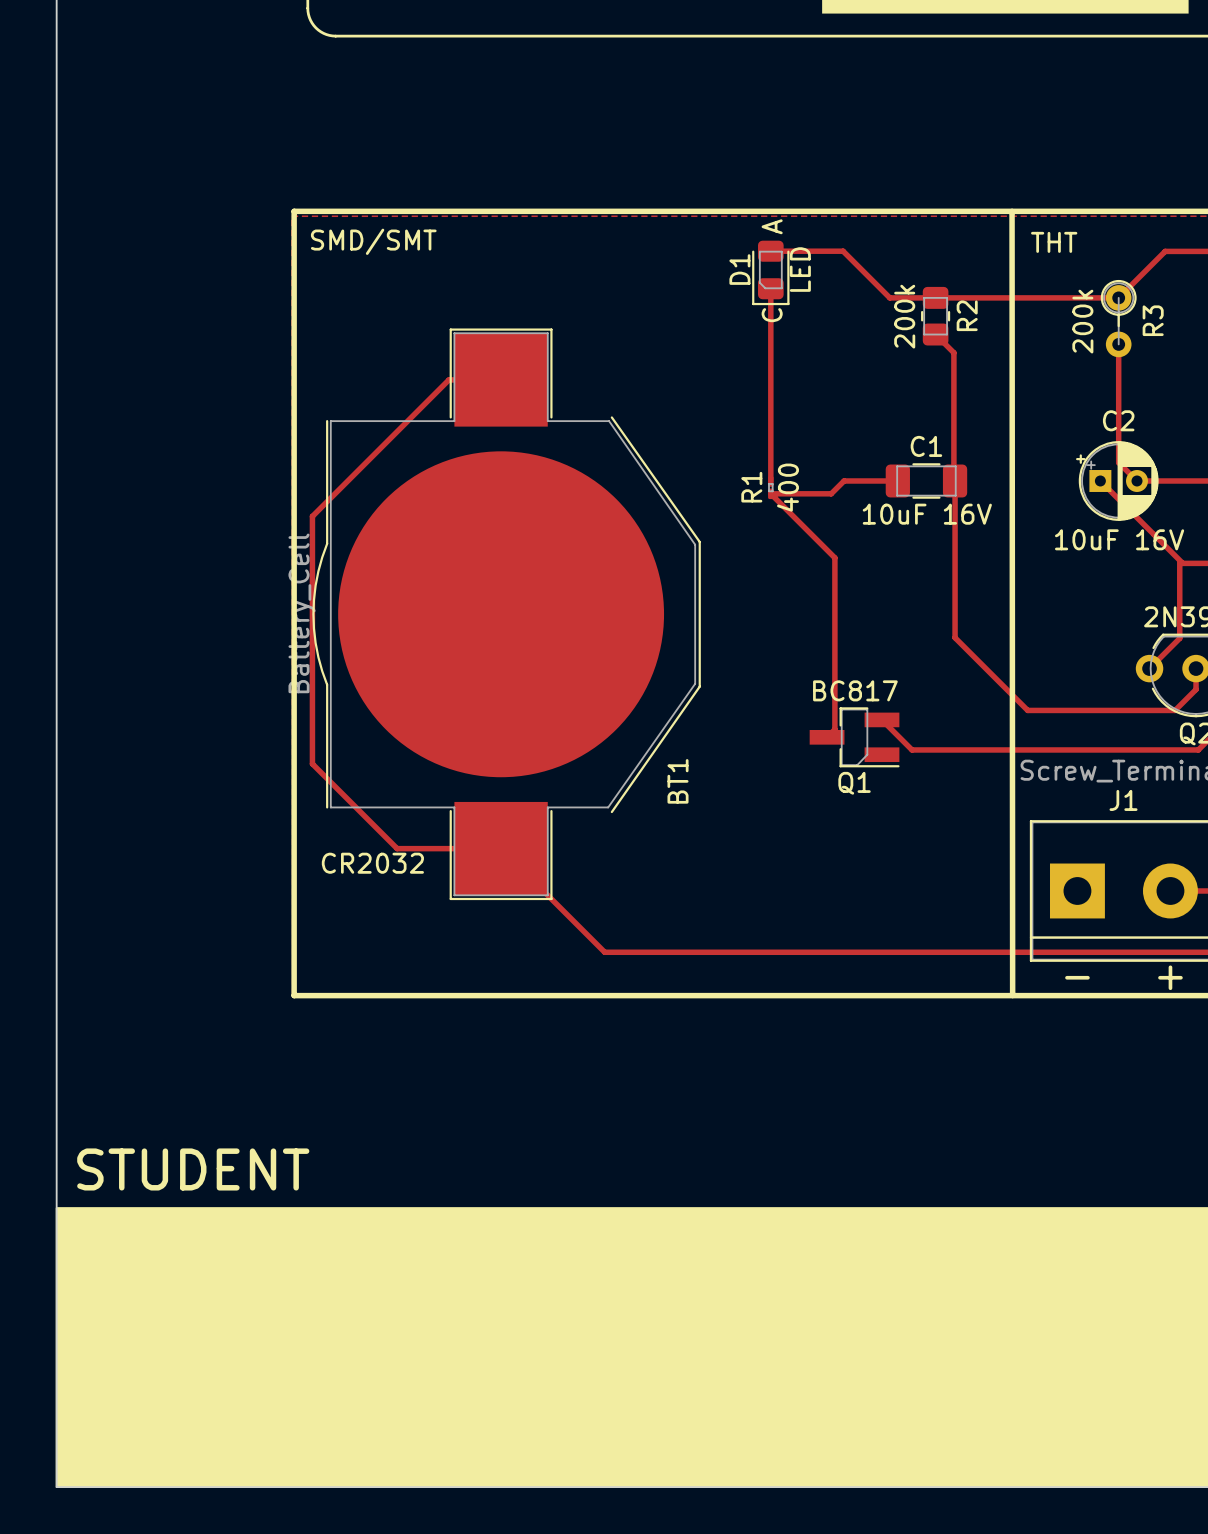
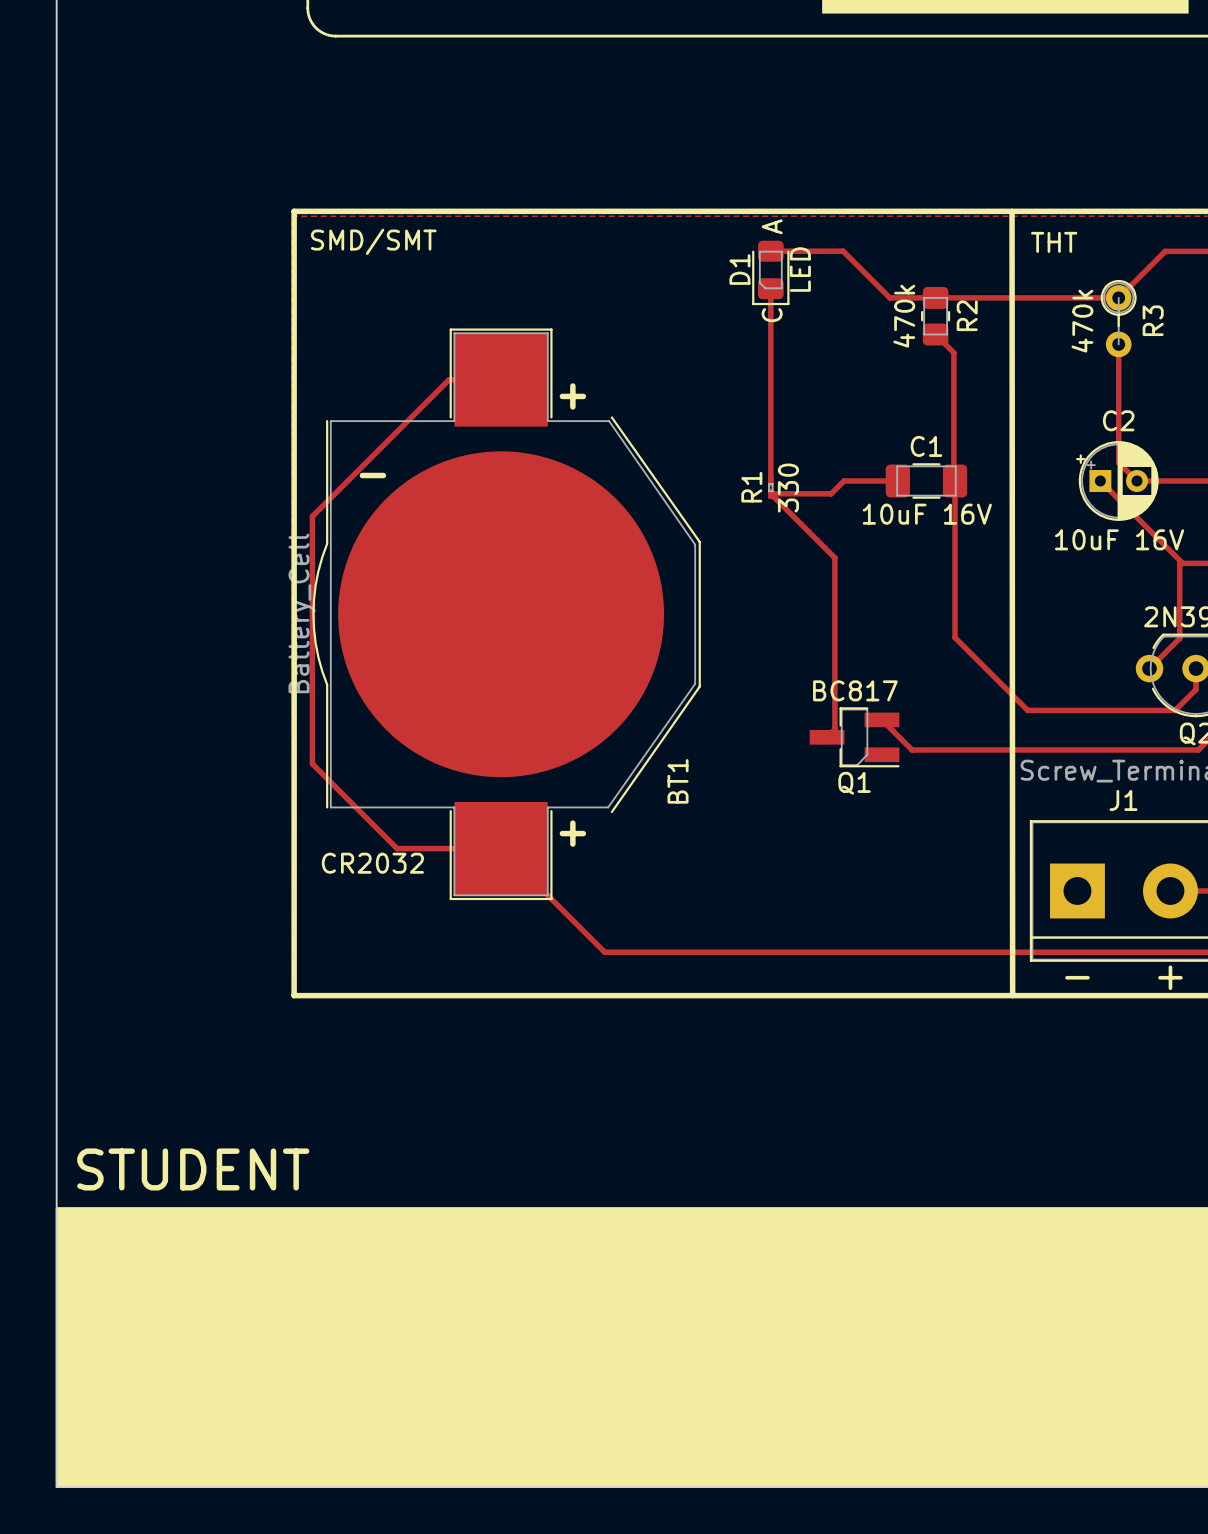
R2 value: 200k (904, 316) -> 470k (904, 316)
R3 value: 200k (1082, 321) -> 470k (1082, 321)
text: none -> + (572, 396)
text: none -> - (372, 475)
R1 value: 400 (788, 487) -> 330 (788, 488)
text: none -> + (572, 833)

